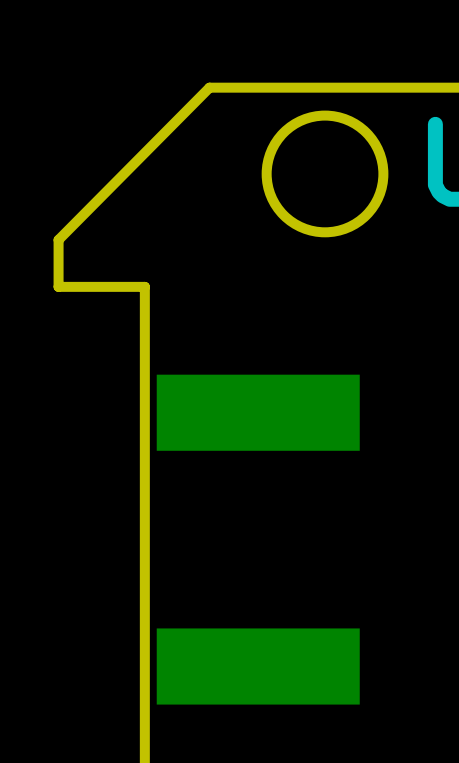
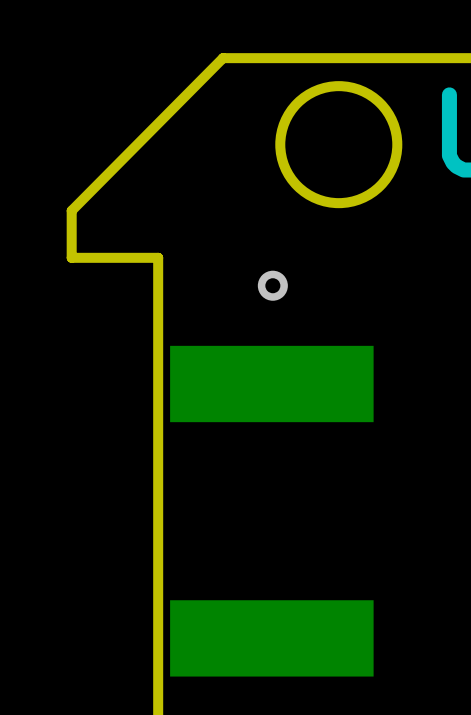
via: none -> (272, 285)

